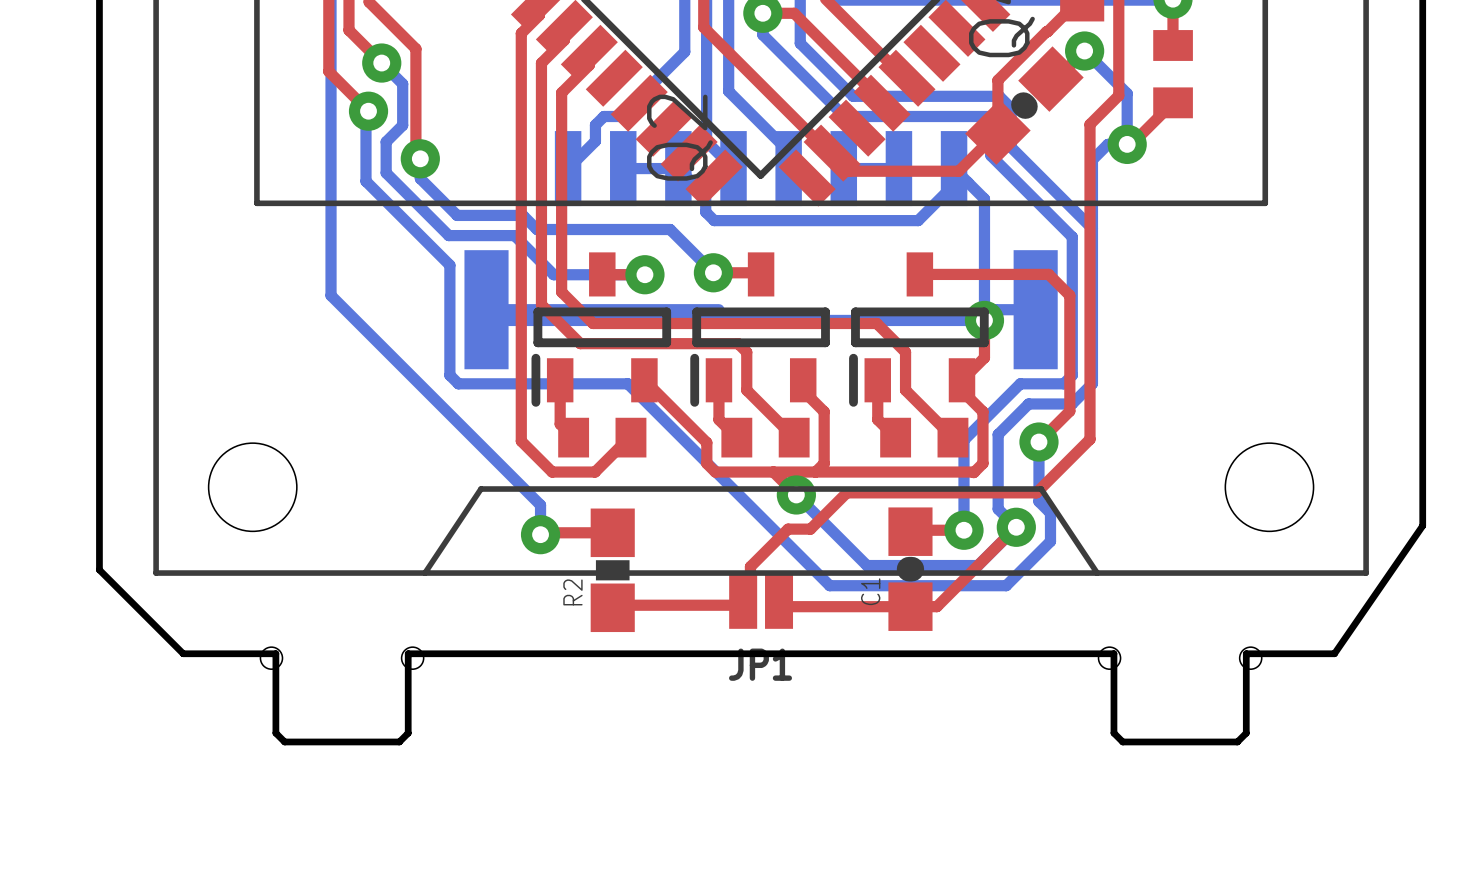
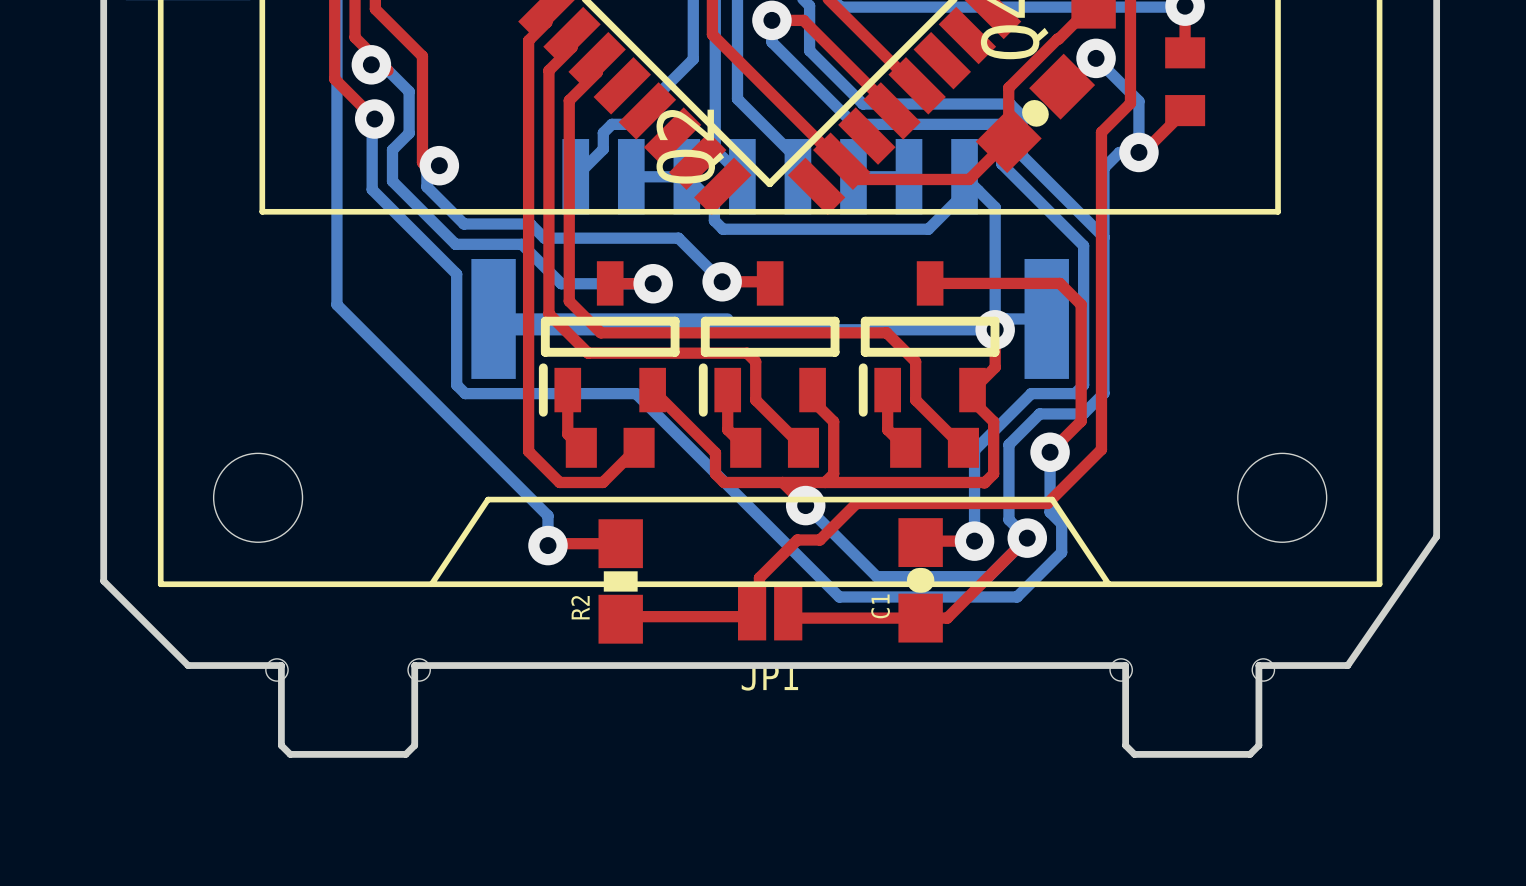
via position: (381, 63) -> (371, 64)
via position: (420, 158) -> (439, 165)

